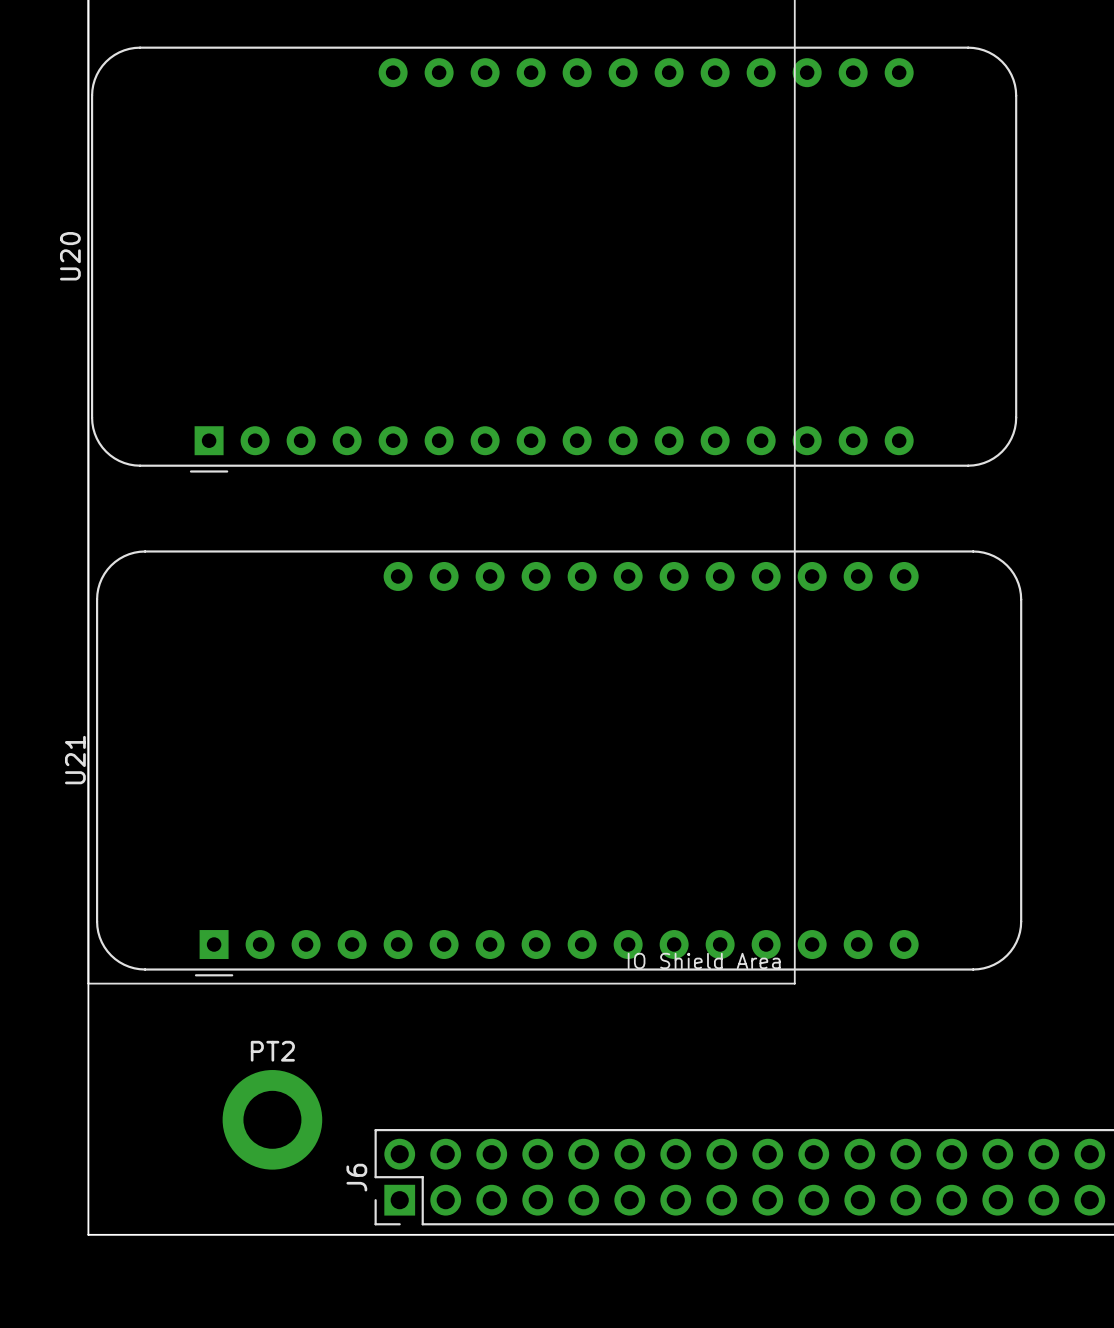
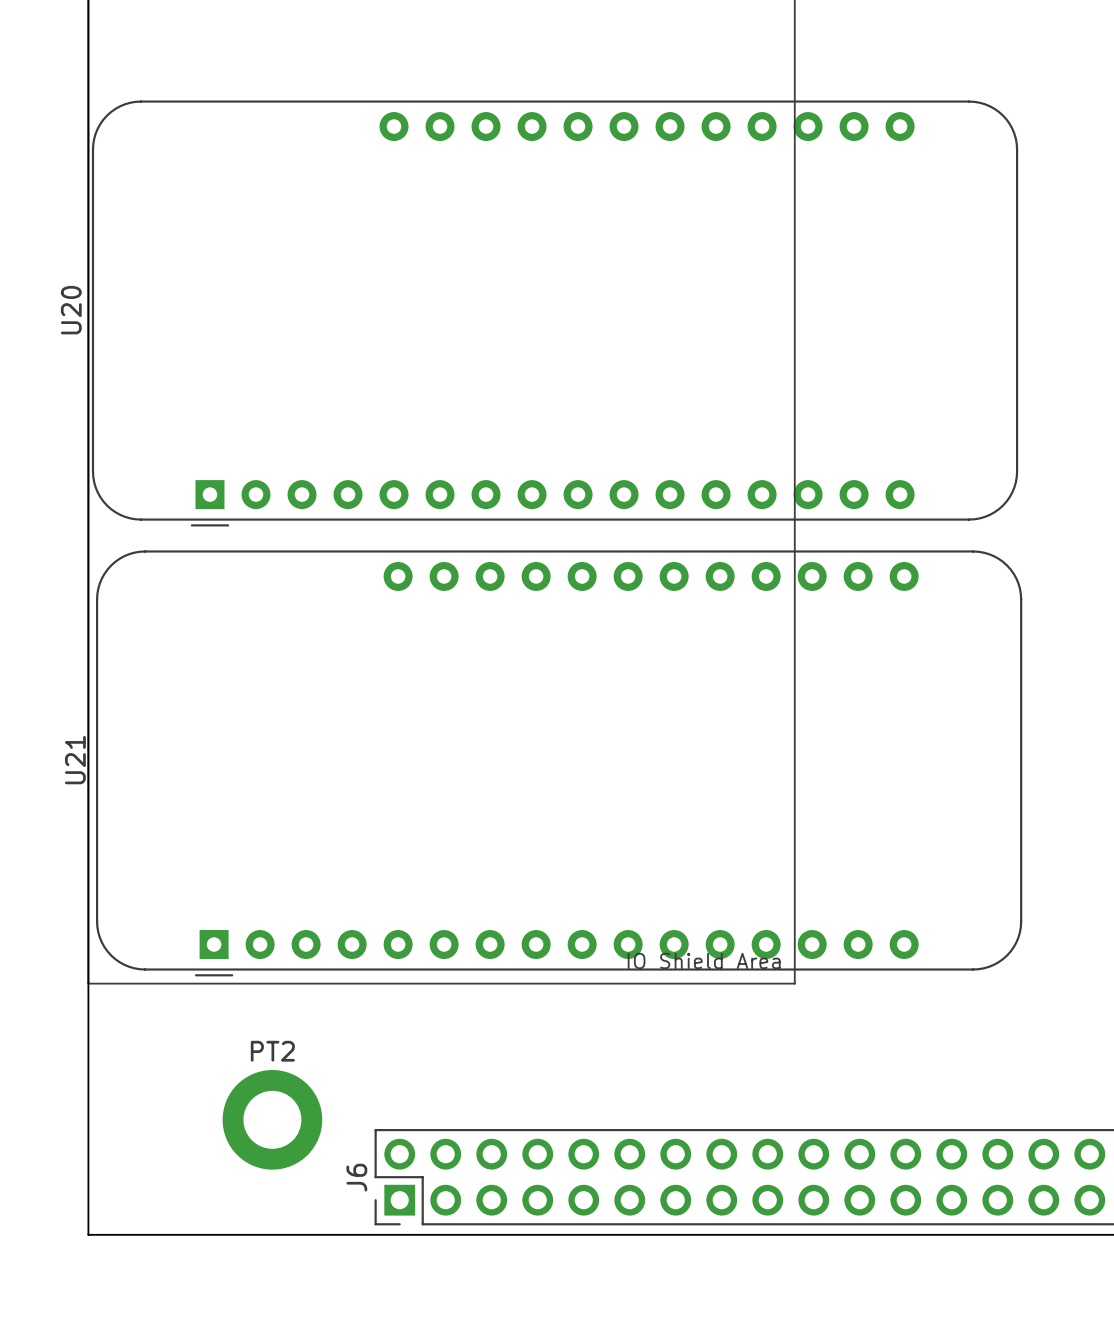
U20 position: (554, 259) -> (555, 313)

